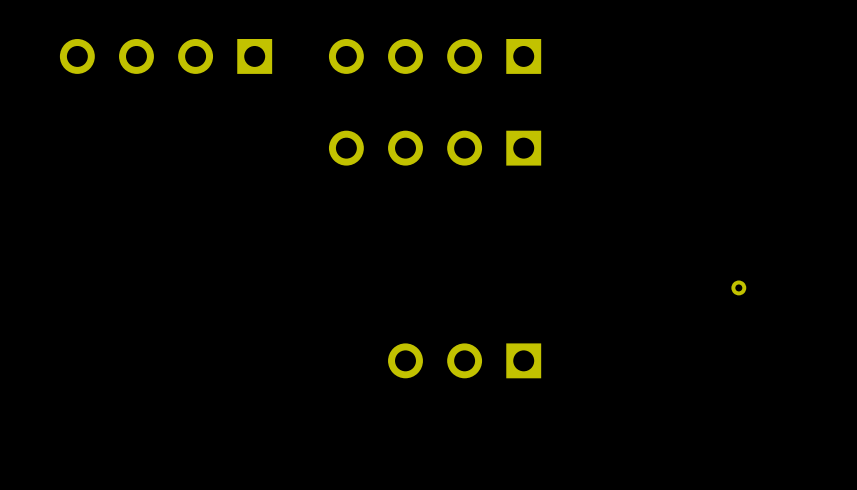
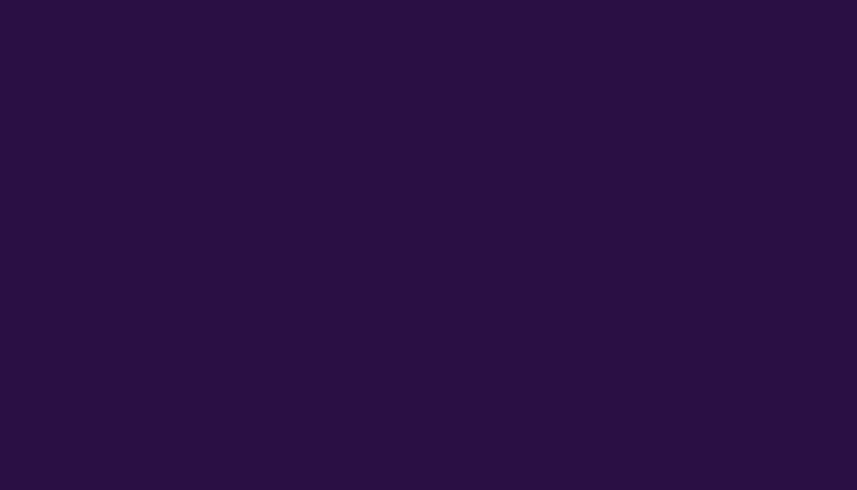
part: (166, 56) -> none
part: (435, 56) -> none
part: (435, 148) -> none
part: (738, 287) -> none
part: (464, 360) -> none

